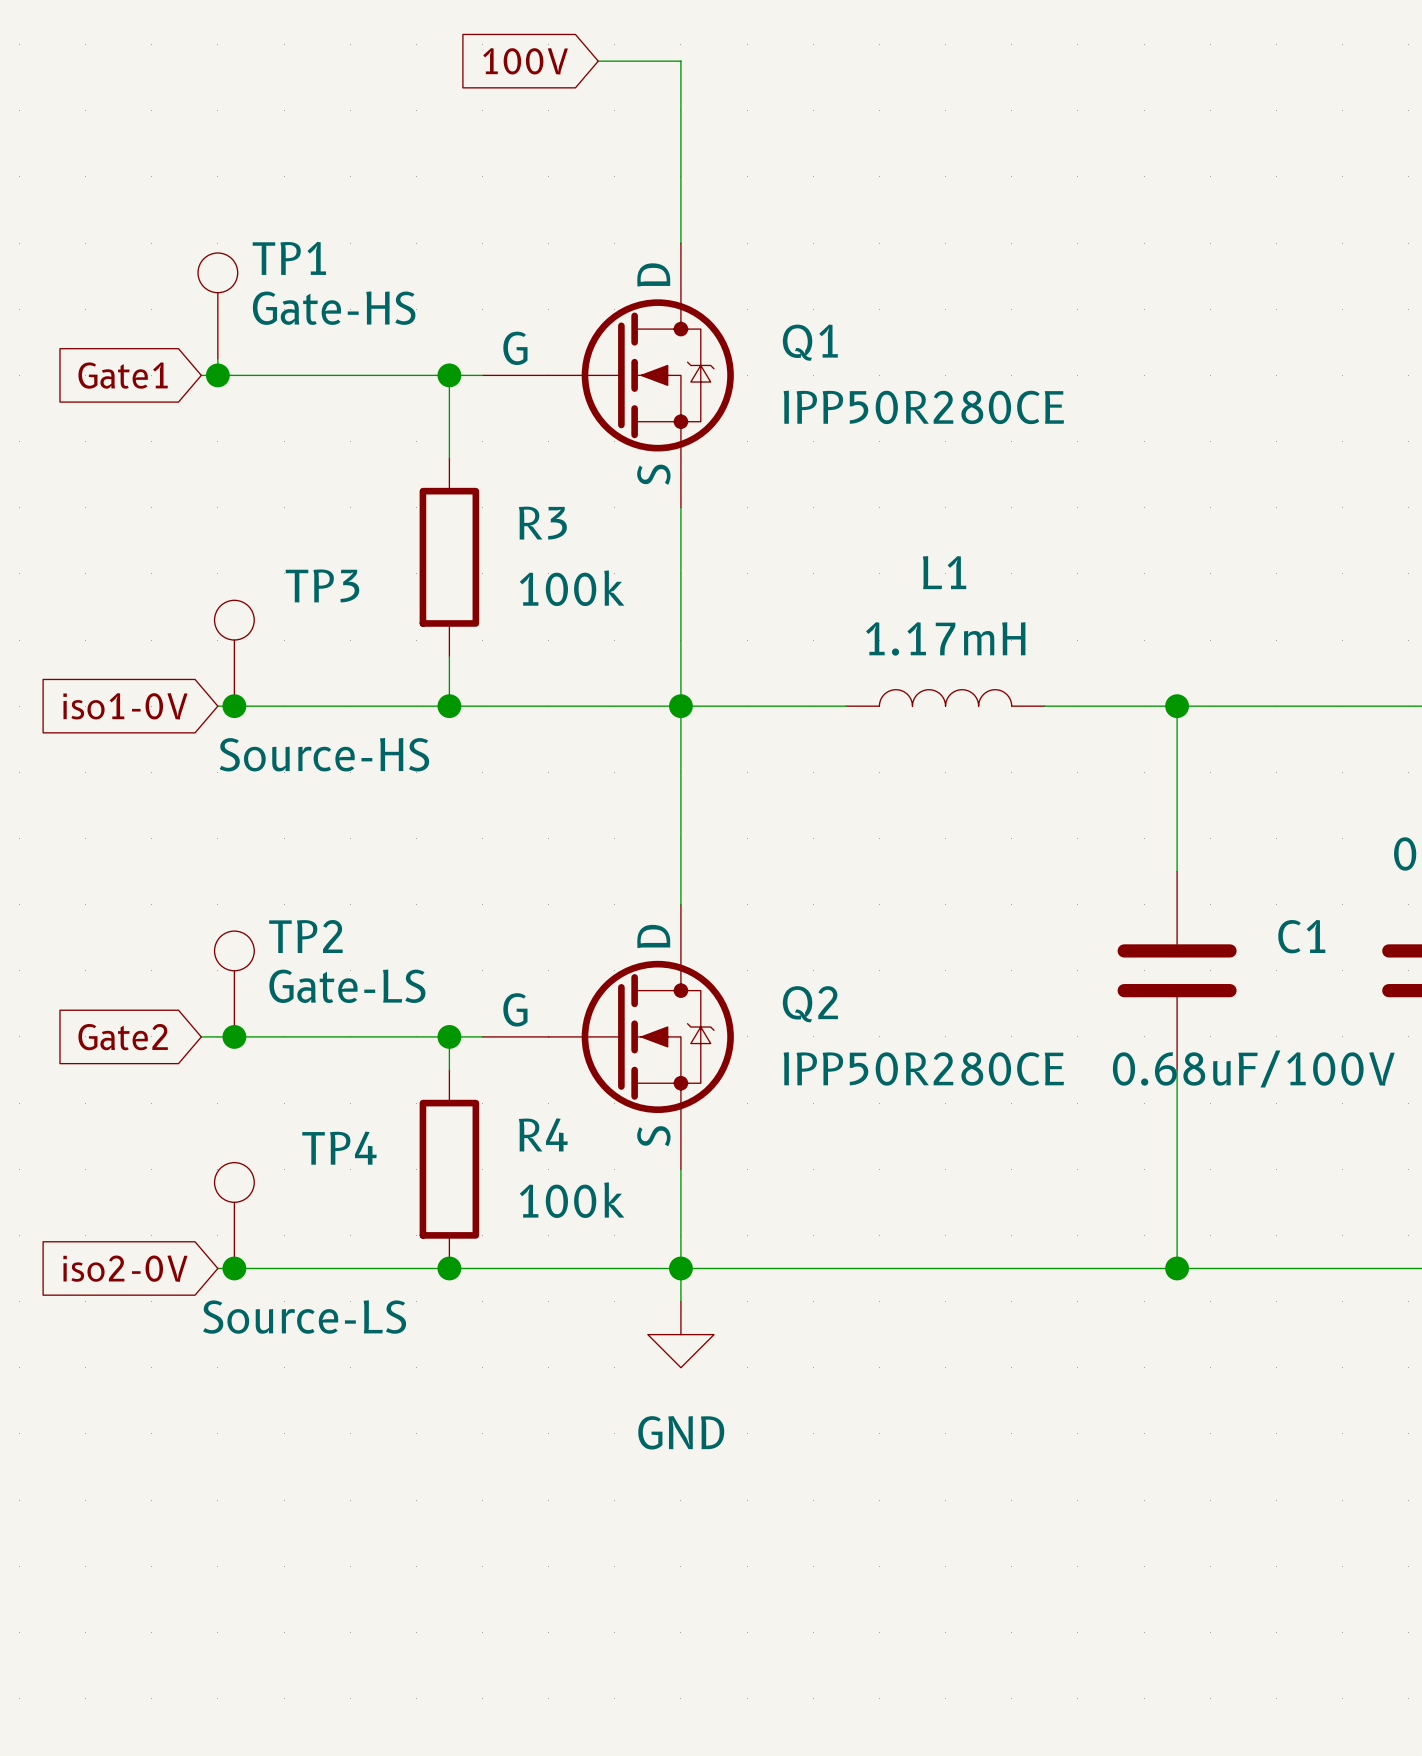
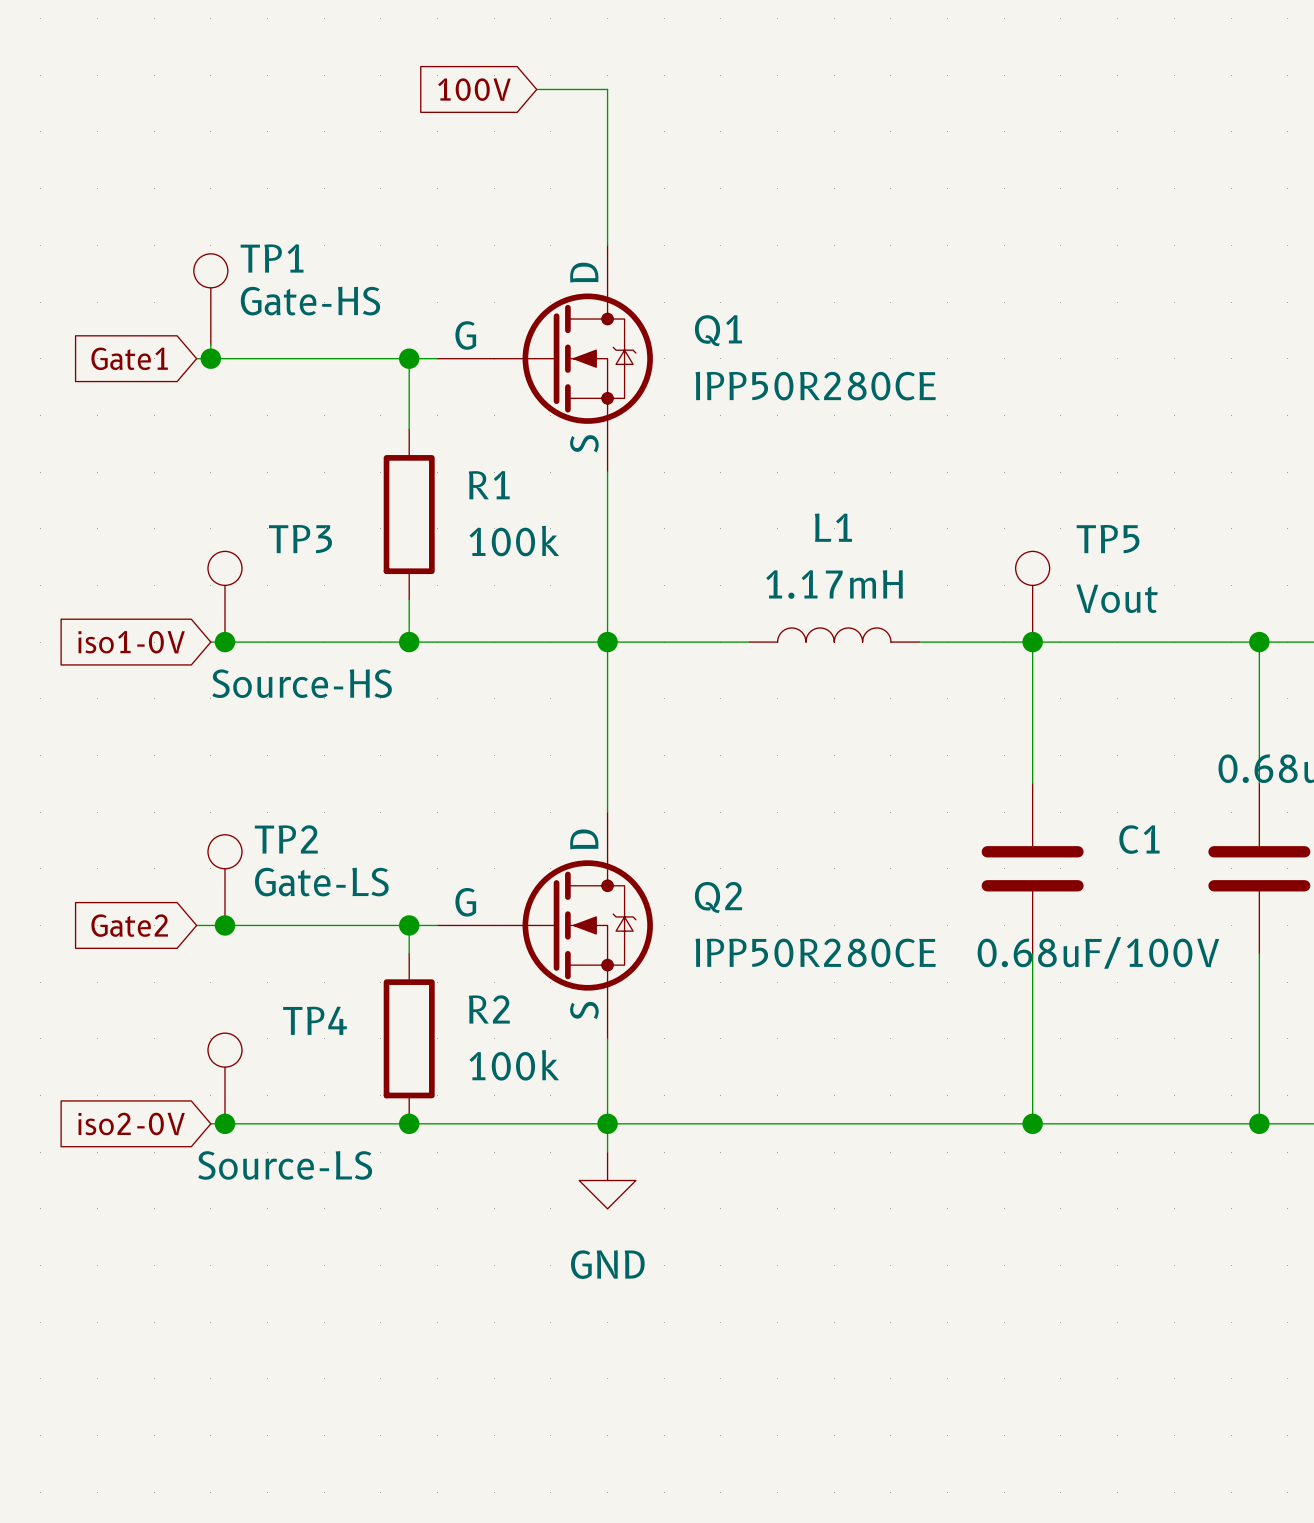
R3 name: R3 (542, 523) -> R1 (489, 485)
TP5: none -> Vout (1032, 596)
R4 name: R4 (543, 1134) -> R2 (489, 1009)

